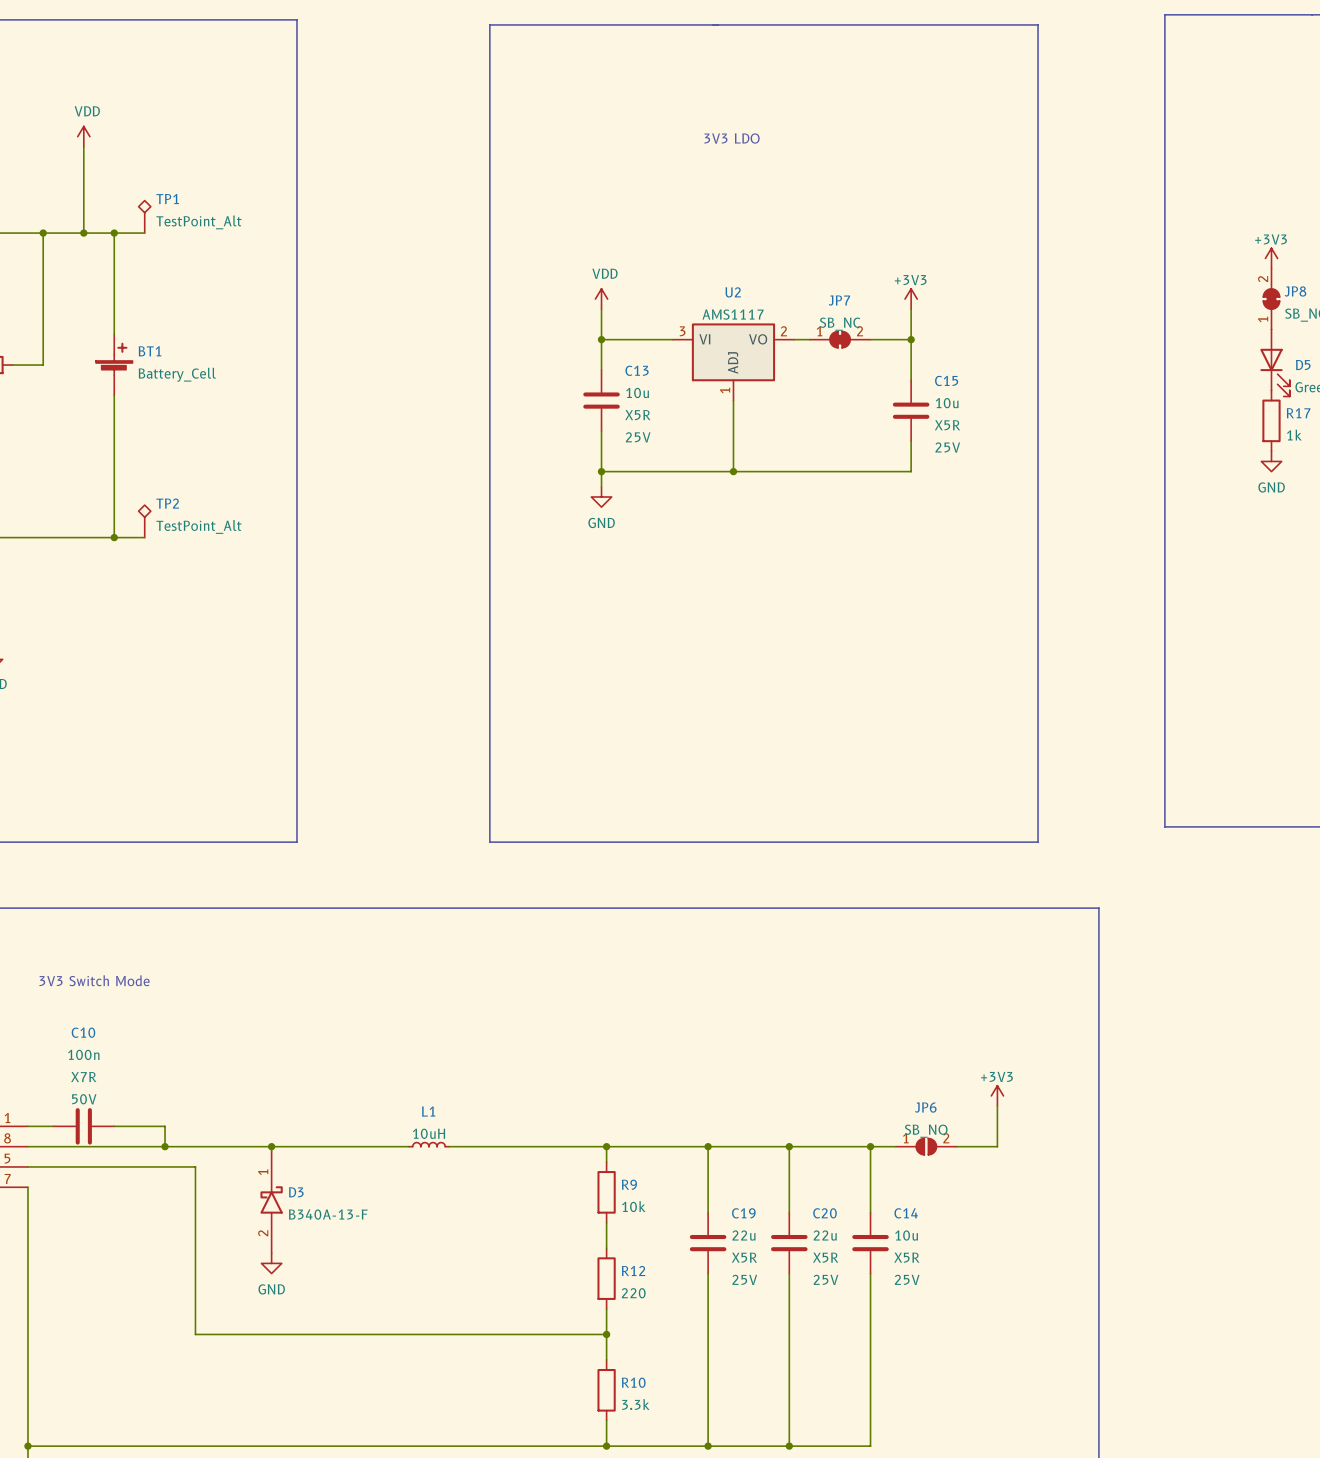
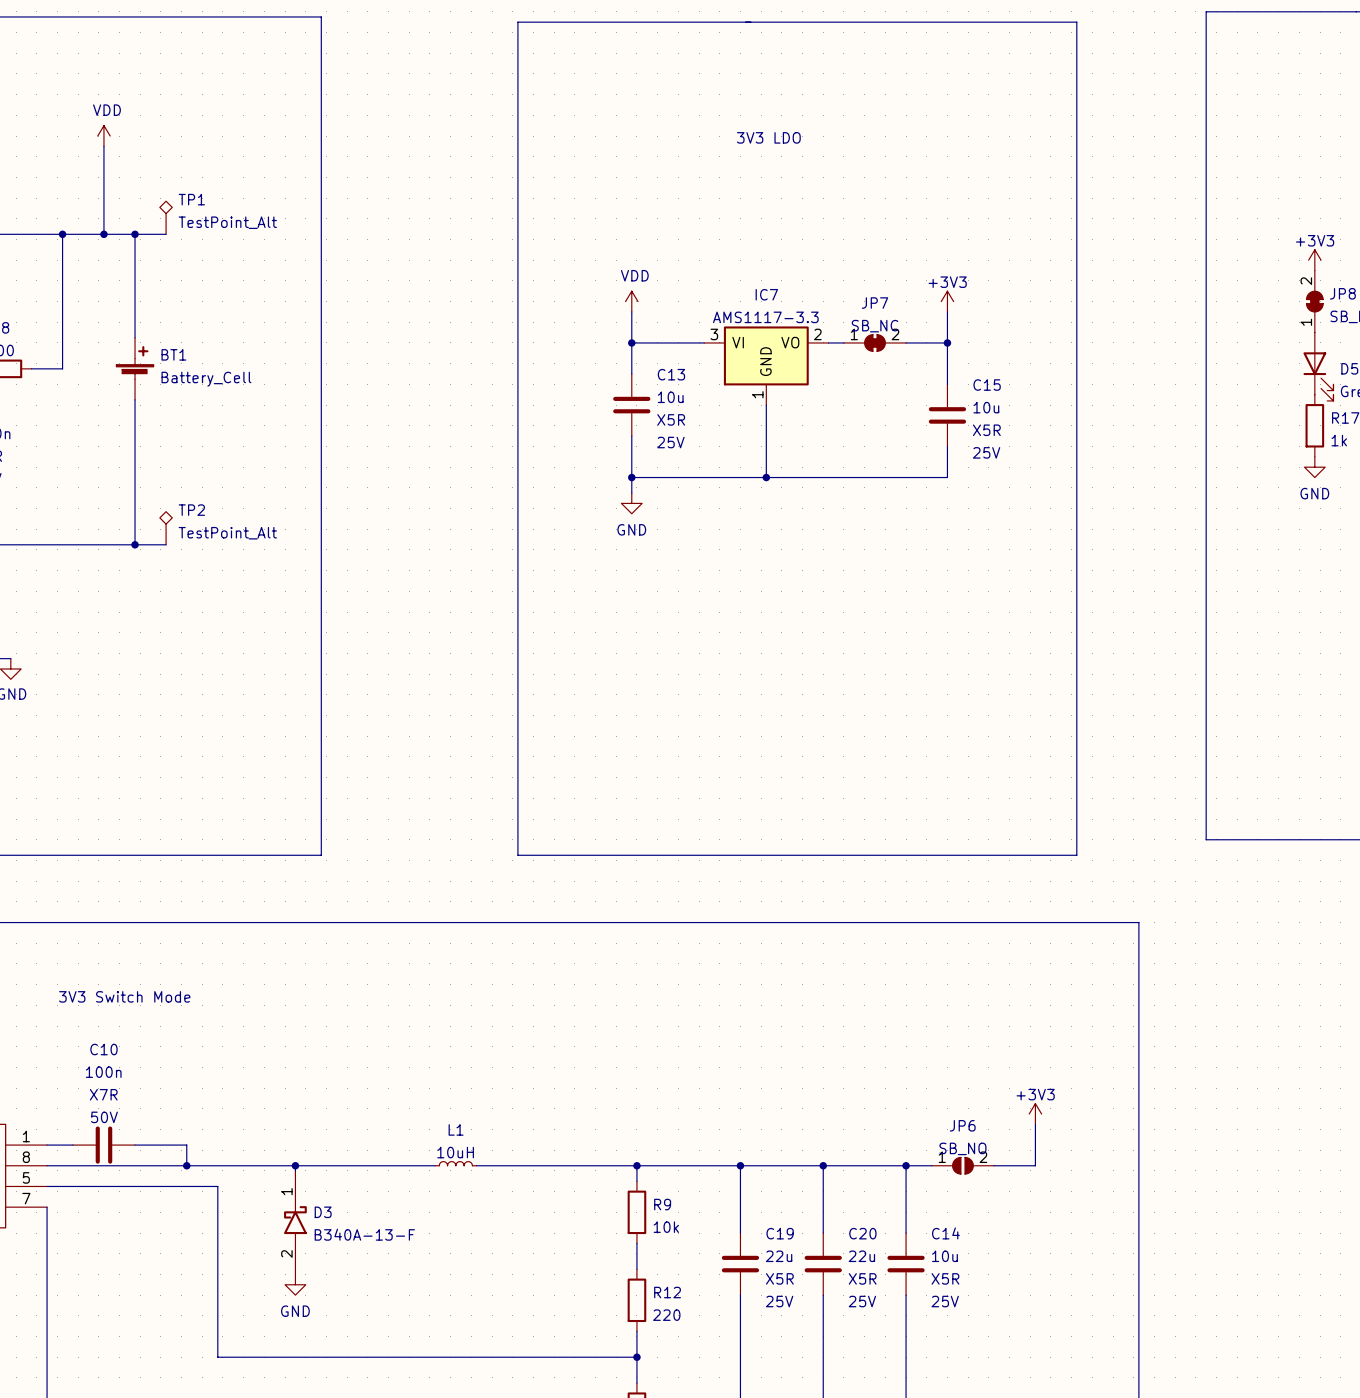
U2 name: U2 (733, 292) -> IC7 (766, 294)
U2 value: AMS1117 (733, 314) -> AMS1117-3.3 (765, 317)
U2 pin name: ADJ (733, 362) -> GND (765, 361)

